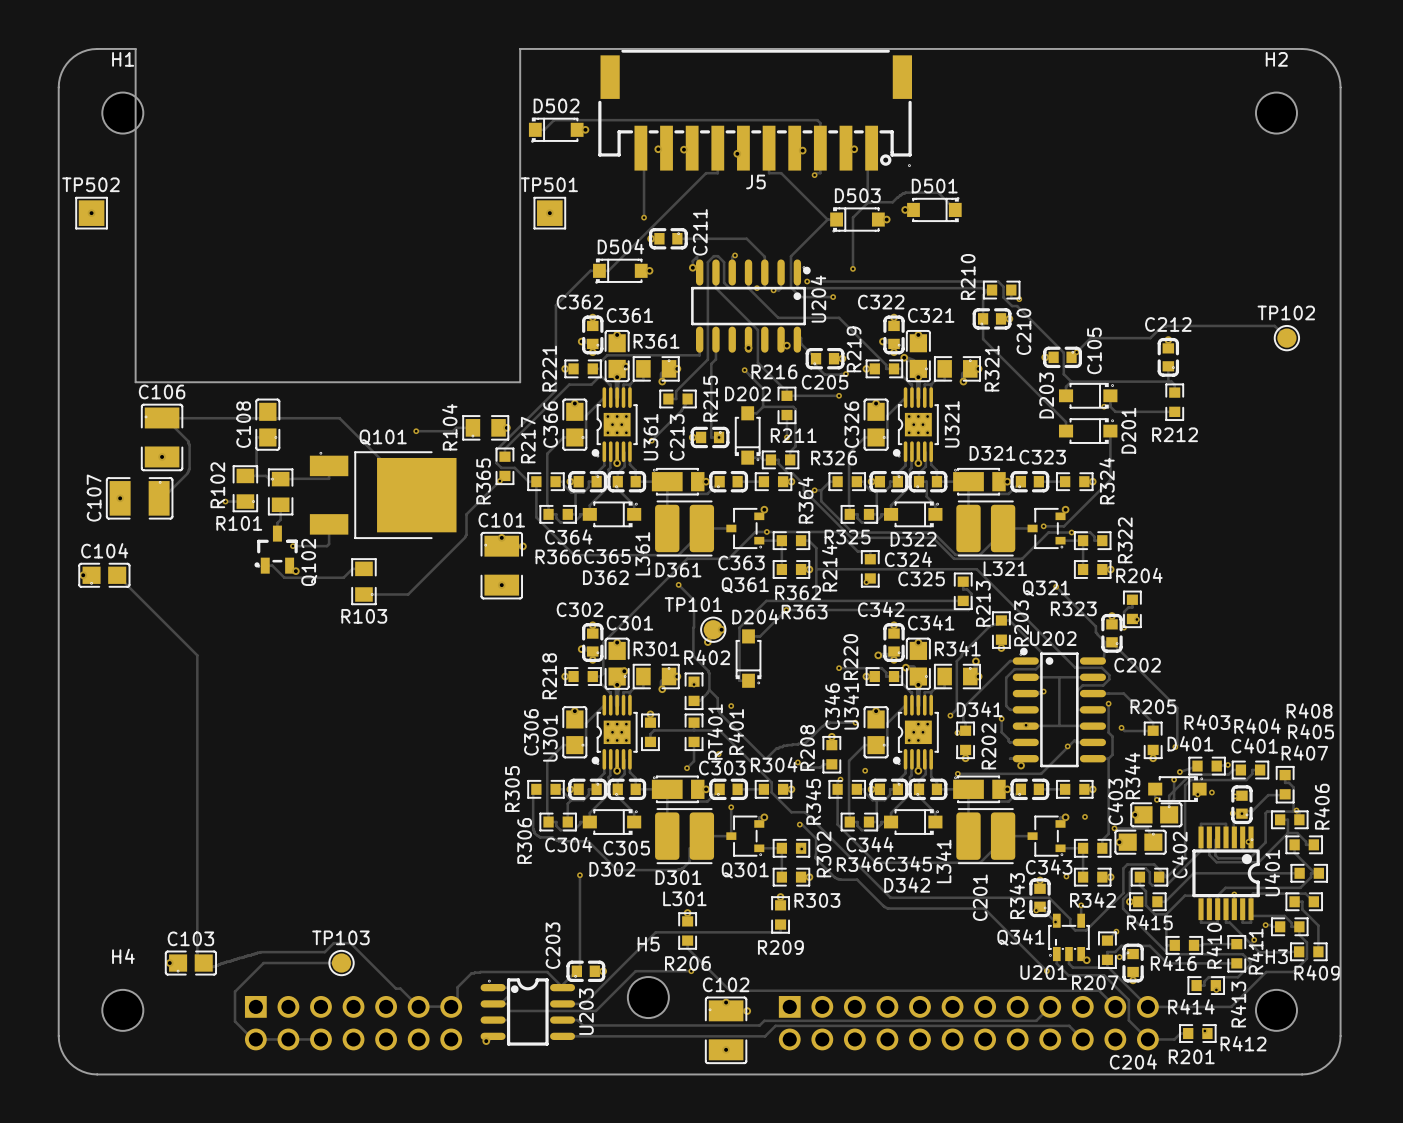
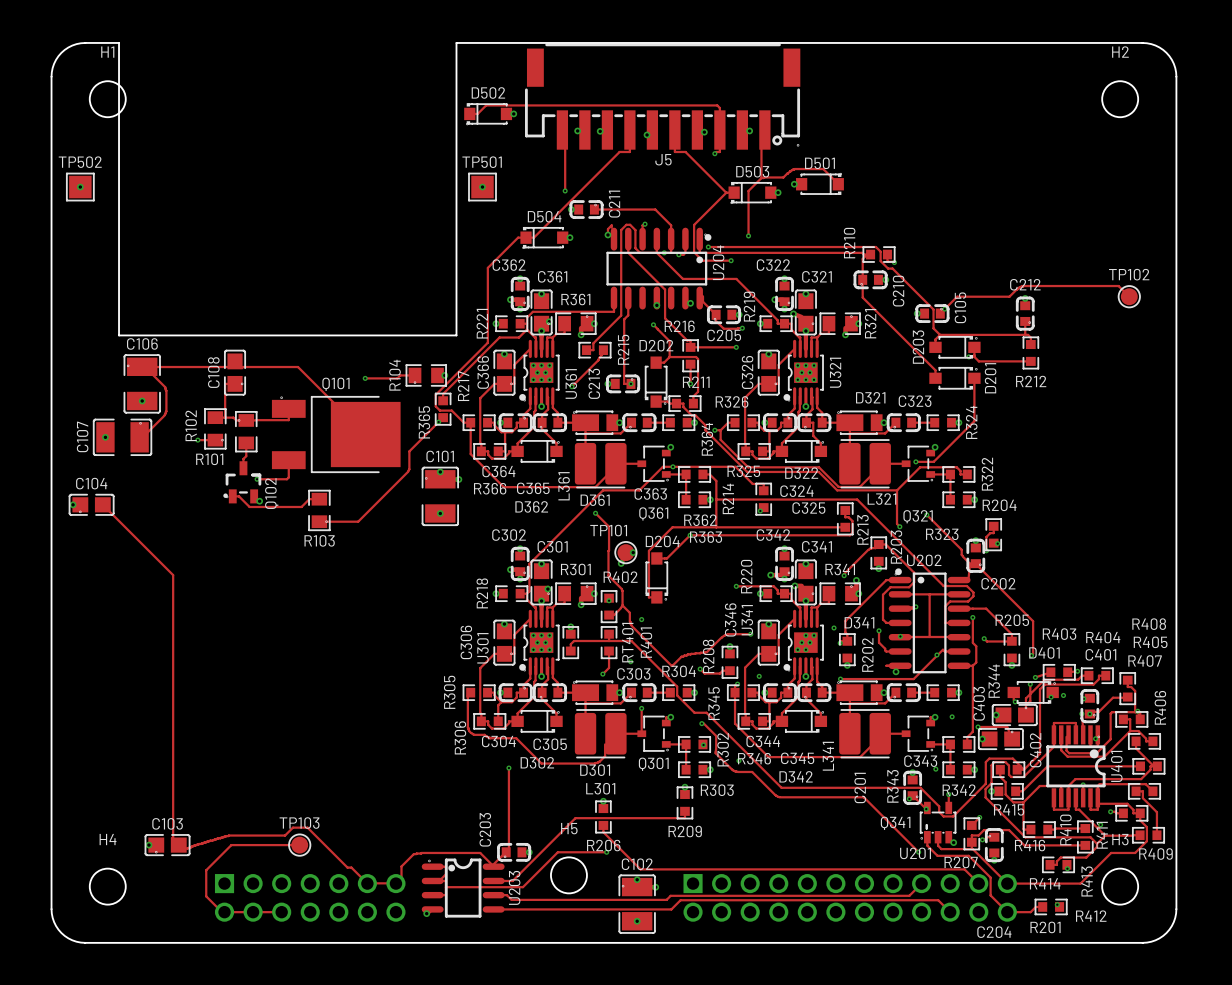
via: (1071, 532) -> none
track: none -> (897, 490) (897, 523) (899, 526)
via: none -> (899, 526)
track: (961, 656) (956, 661) (956, 709) (950, 715) -> none
via: none -> (844, 575)
via: none -> (738, 760)

